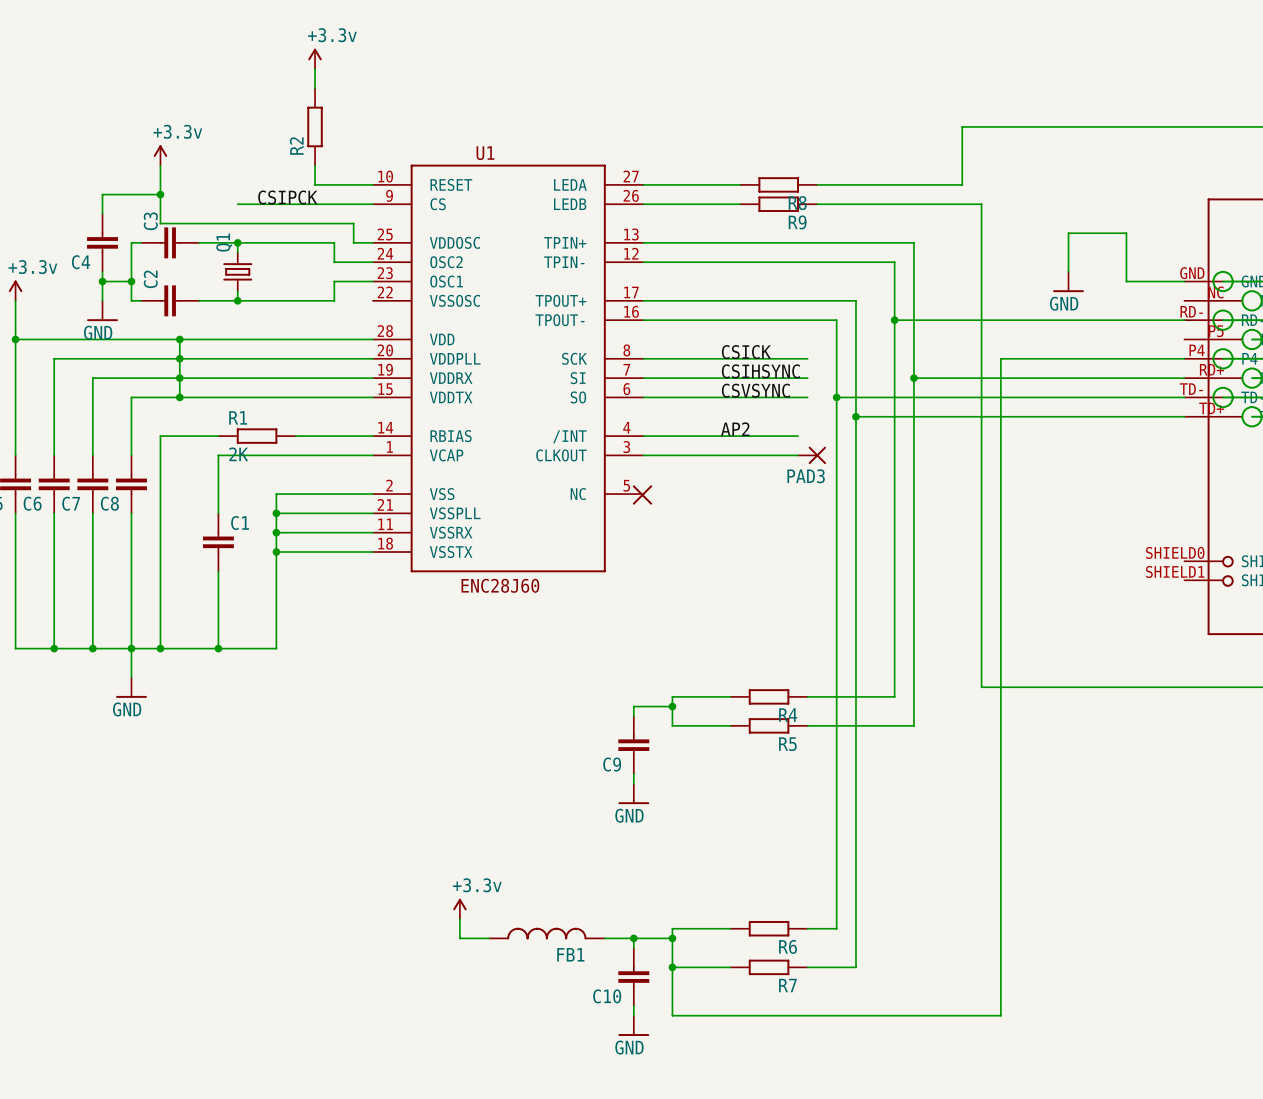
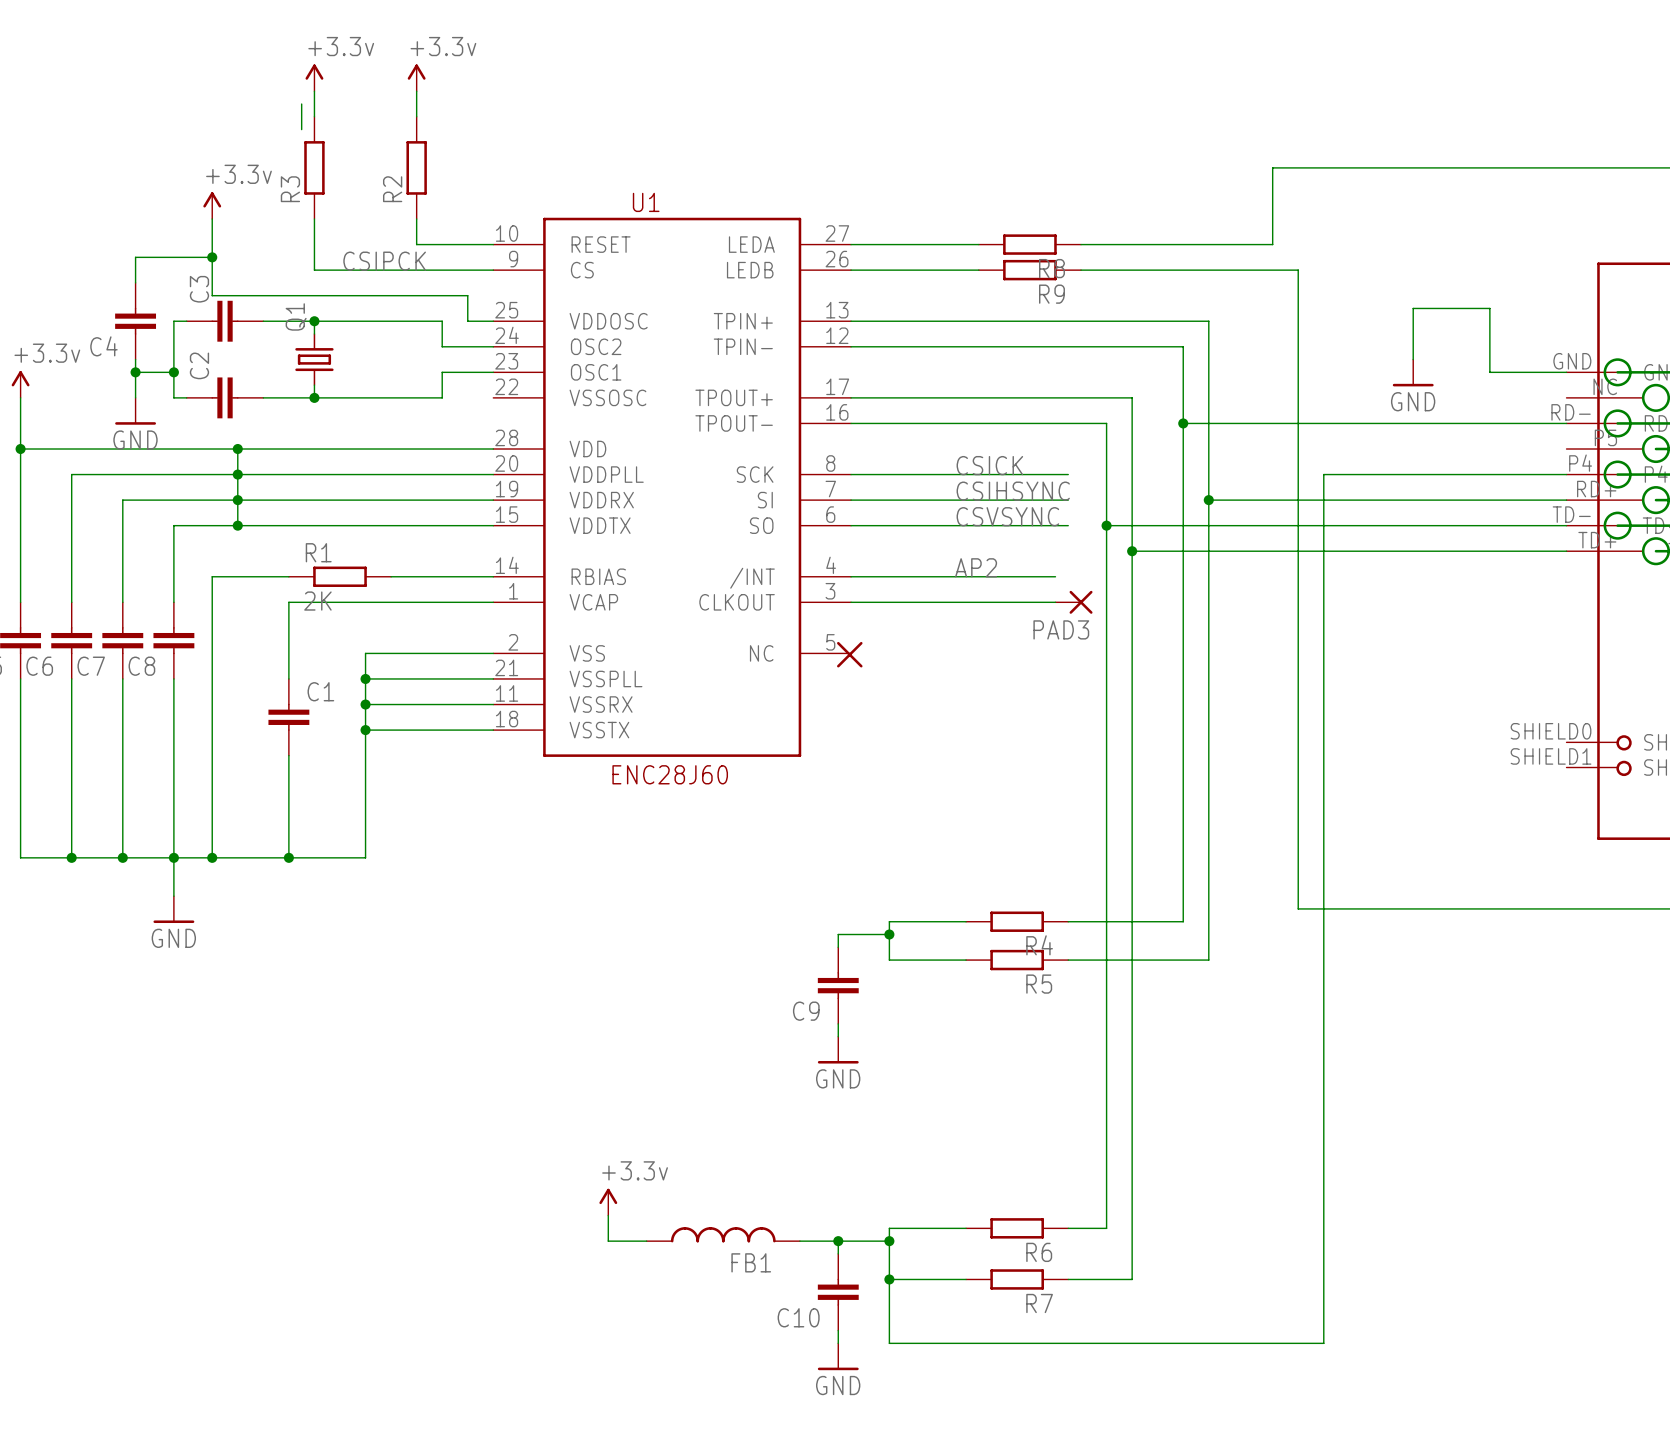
power symbol: none -> +3.3v (314, 77)
wire: none -> (314, 91) (314, 116)
wire: none -> (301, 104) (301, 129)
R3: none -> (314, 167)
wire: none -> (314, 219) (314, 270)

